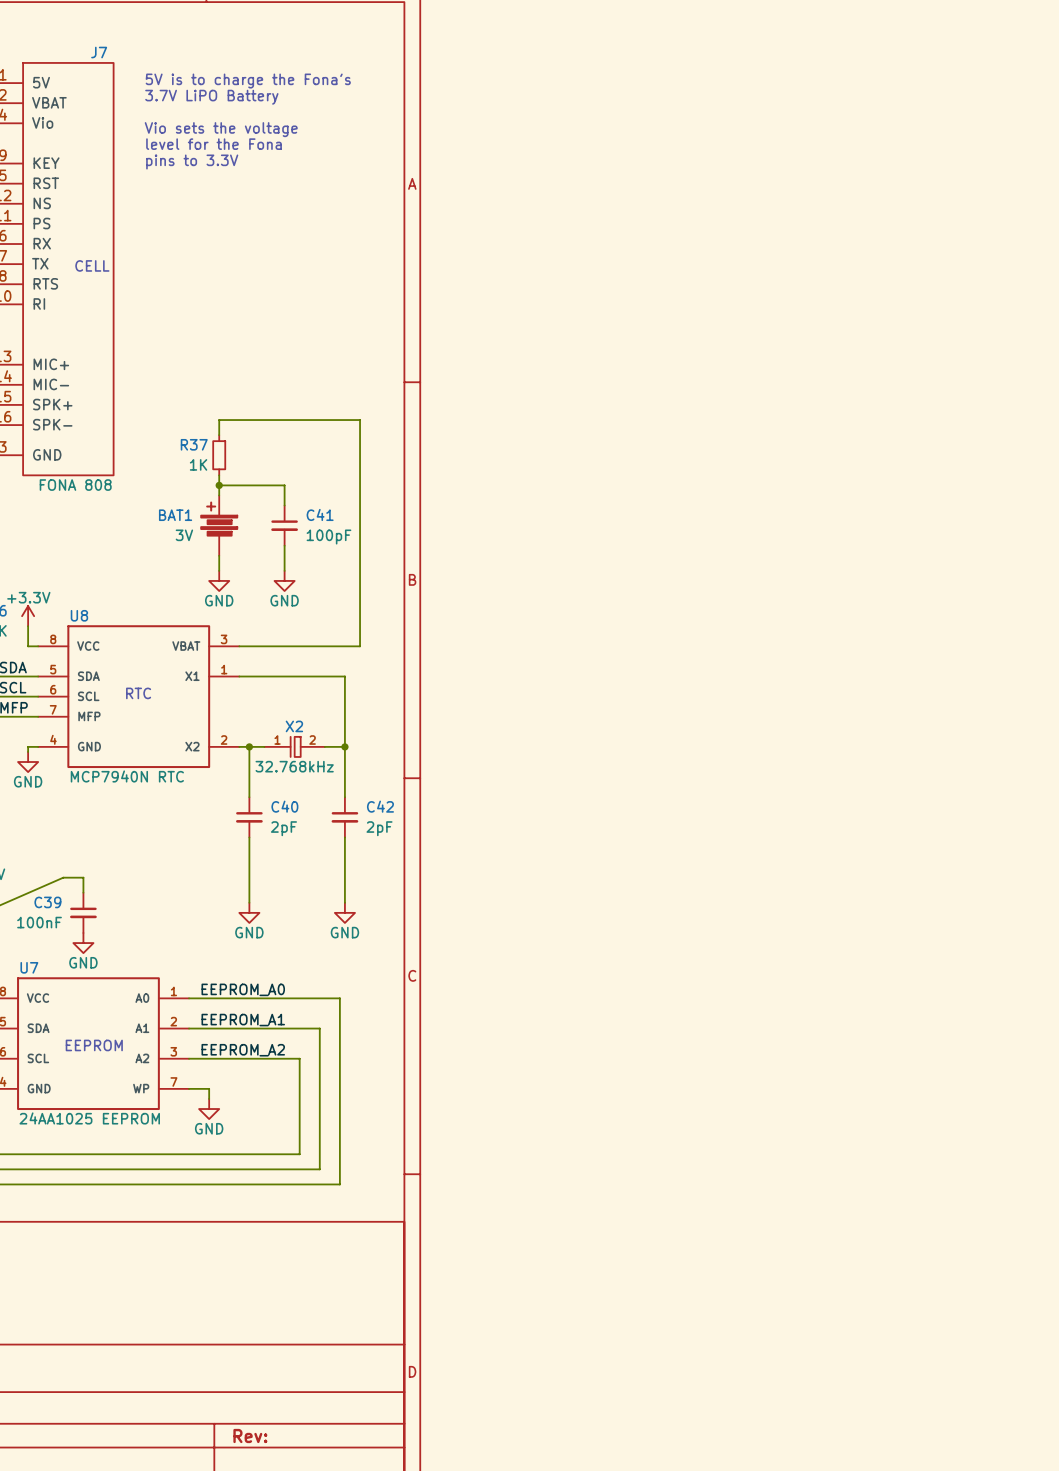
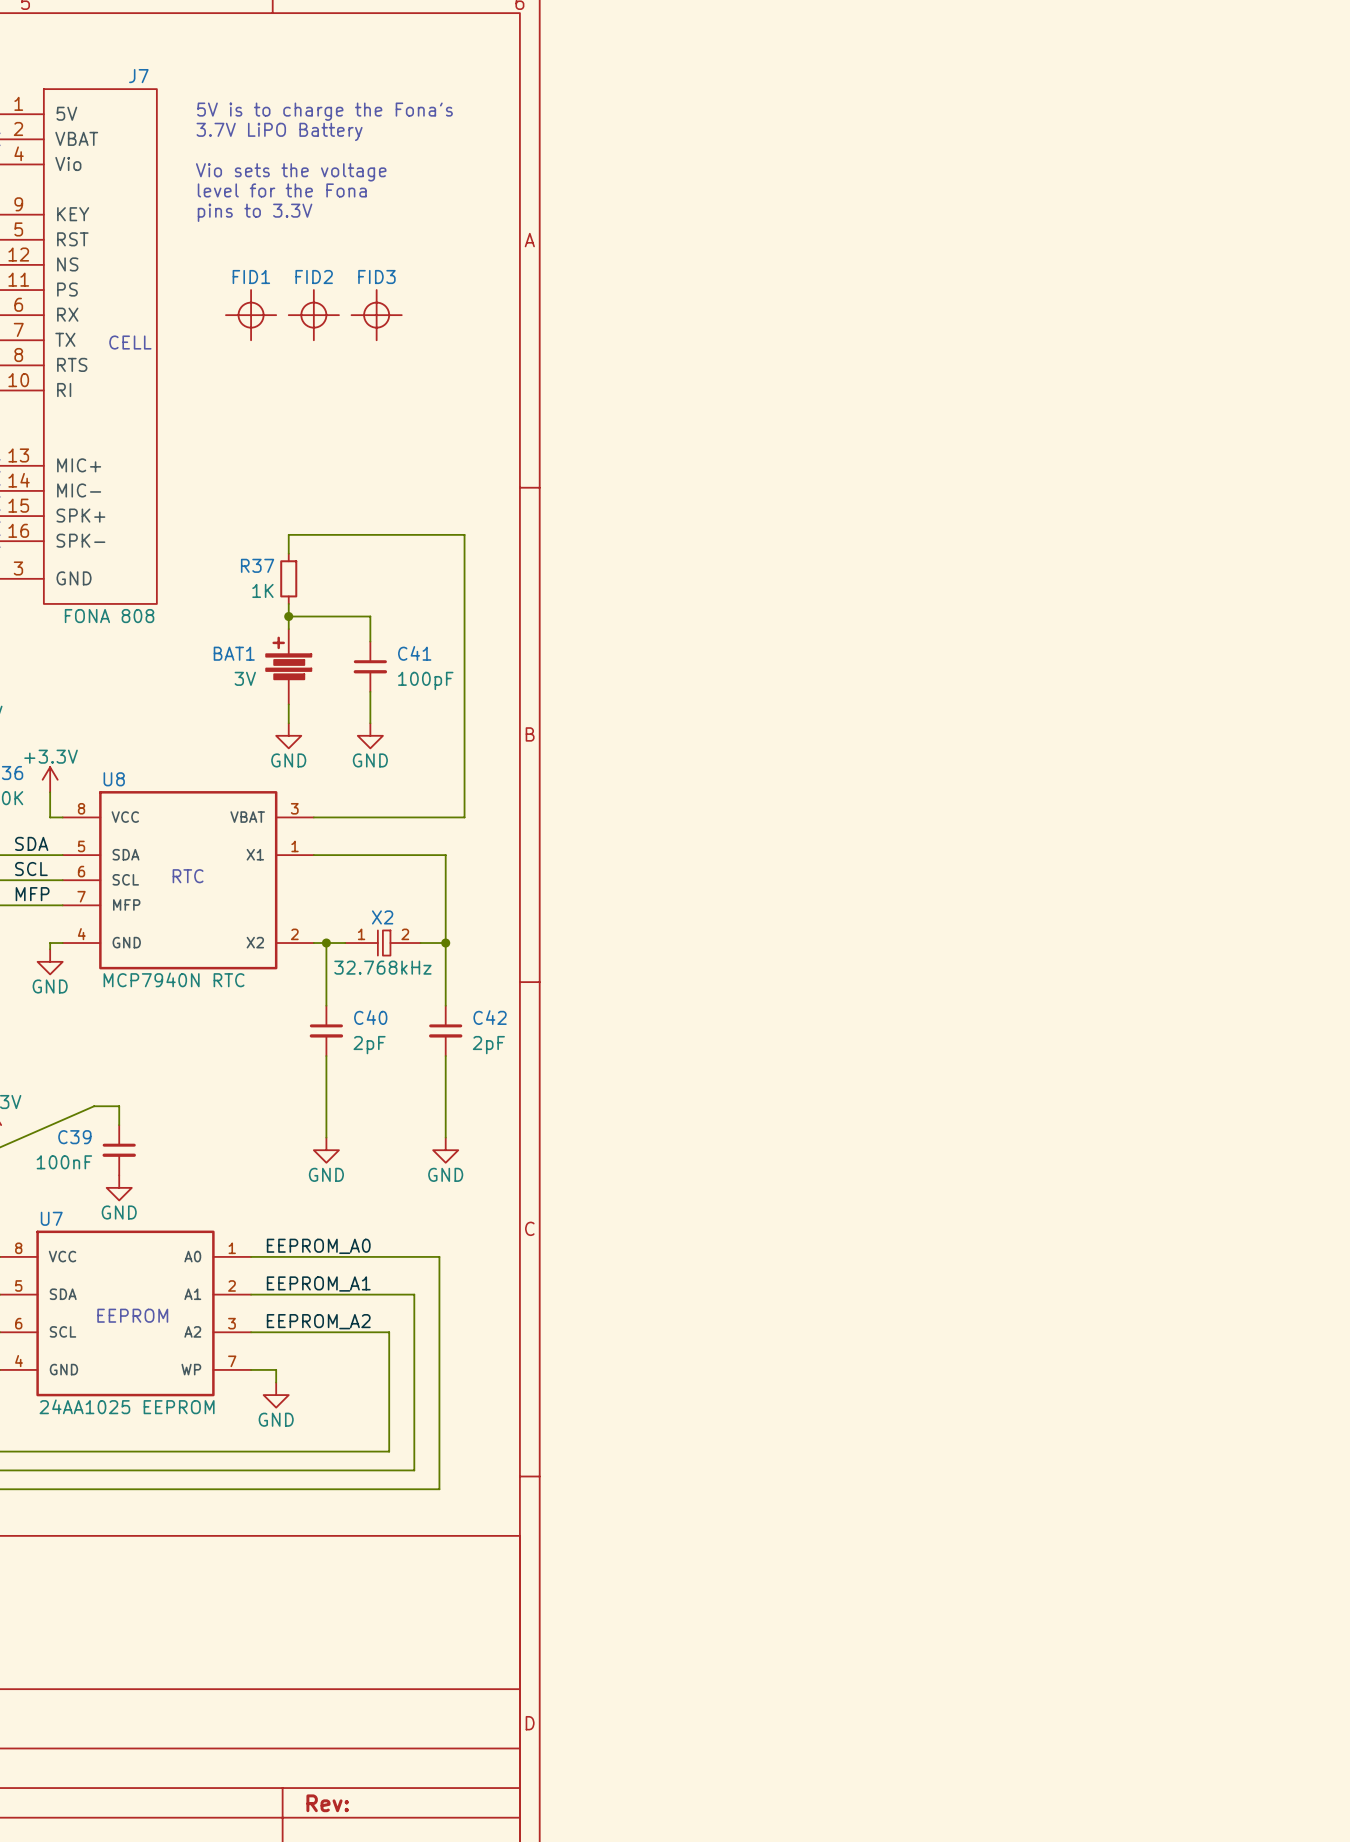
FID1: none -> (251, 315)
FID2: none -> (313, 315)
FID3: none -> (376, 315)

